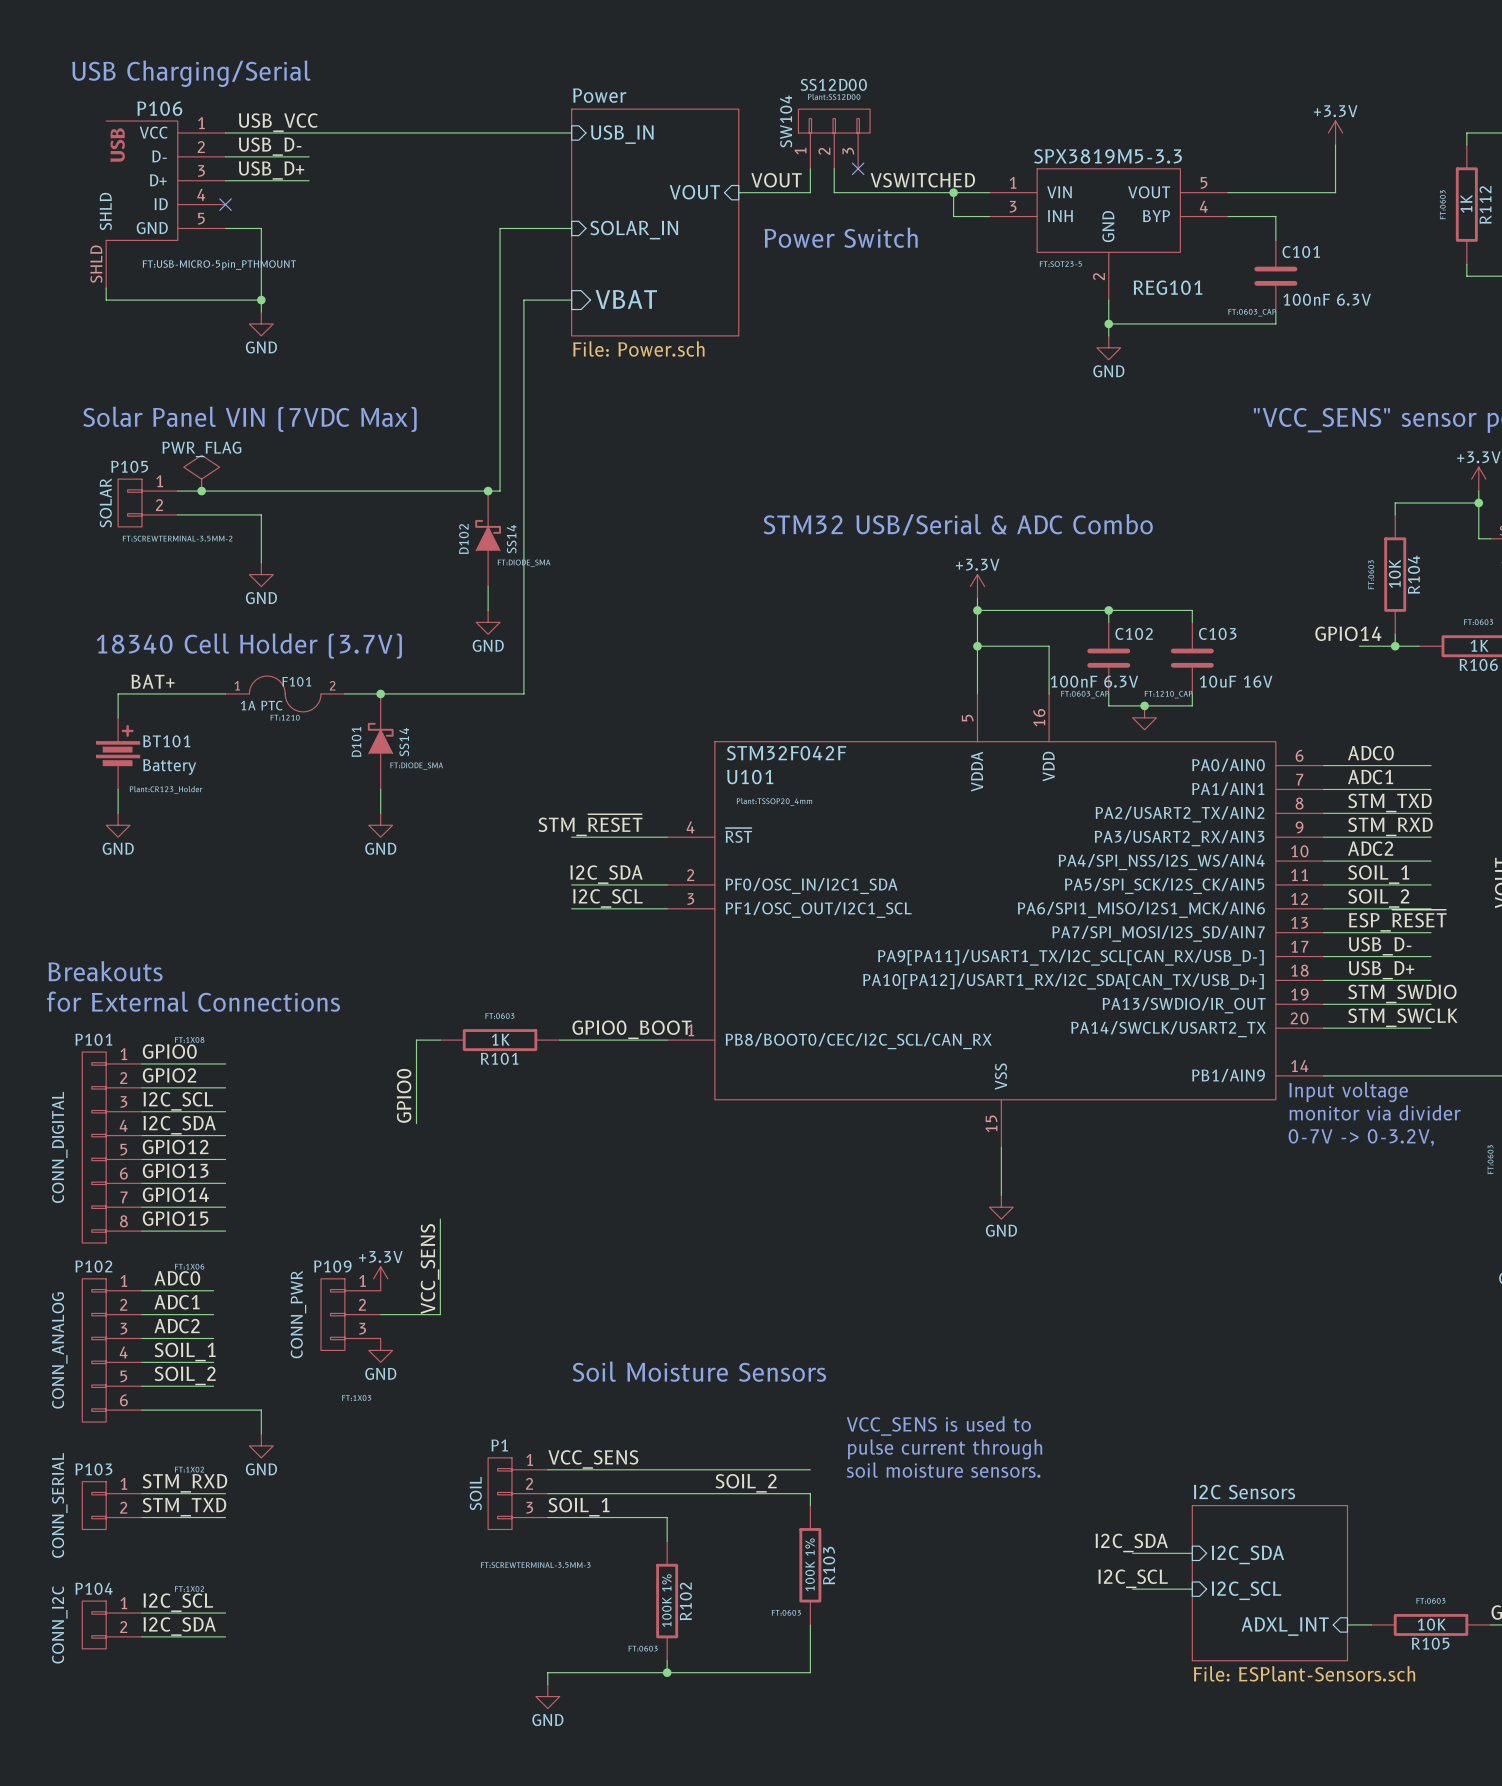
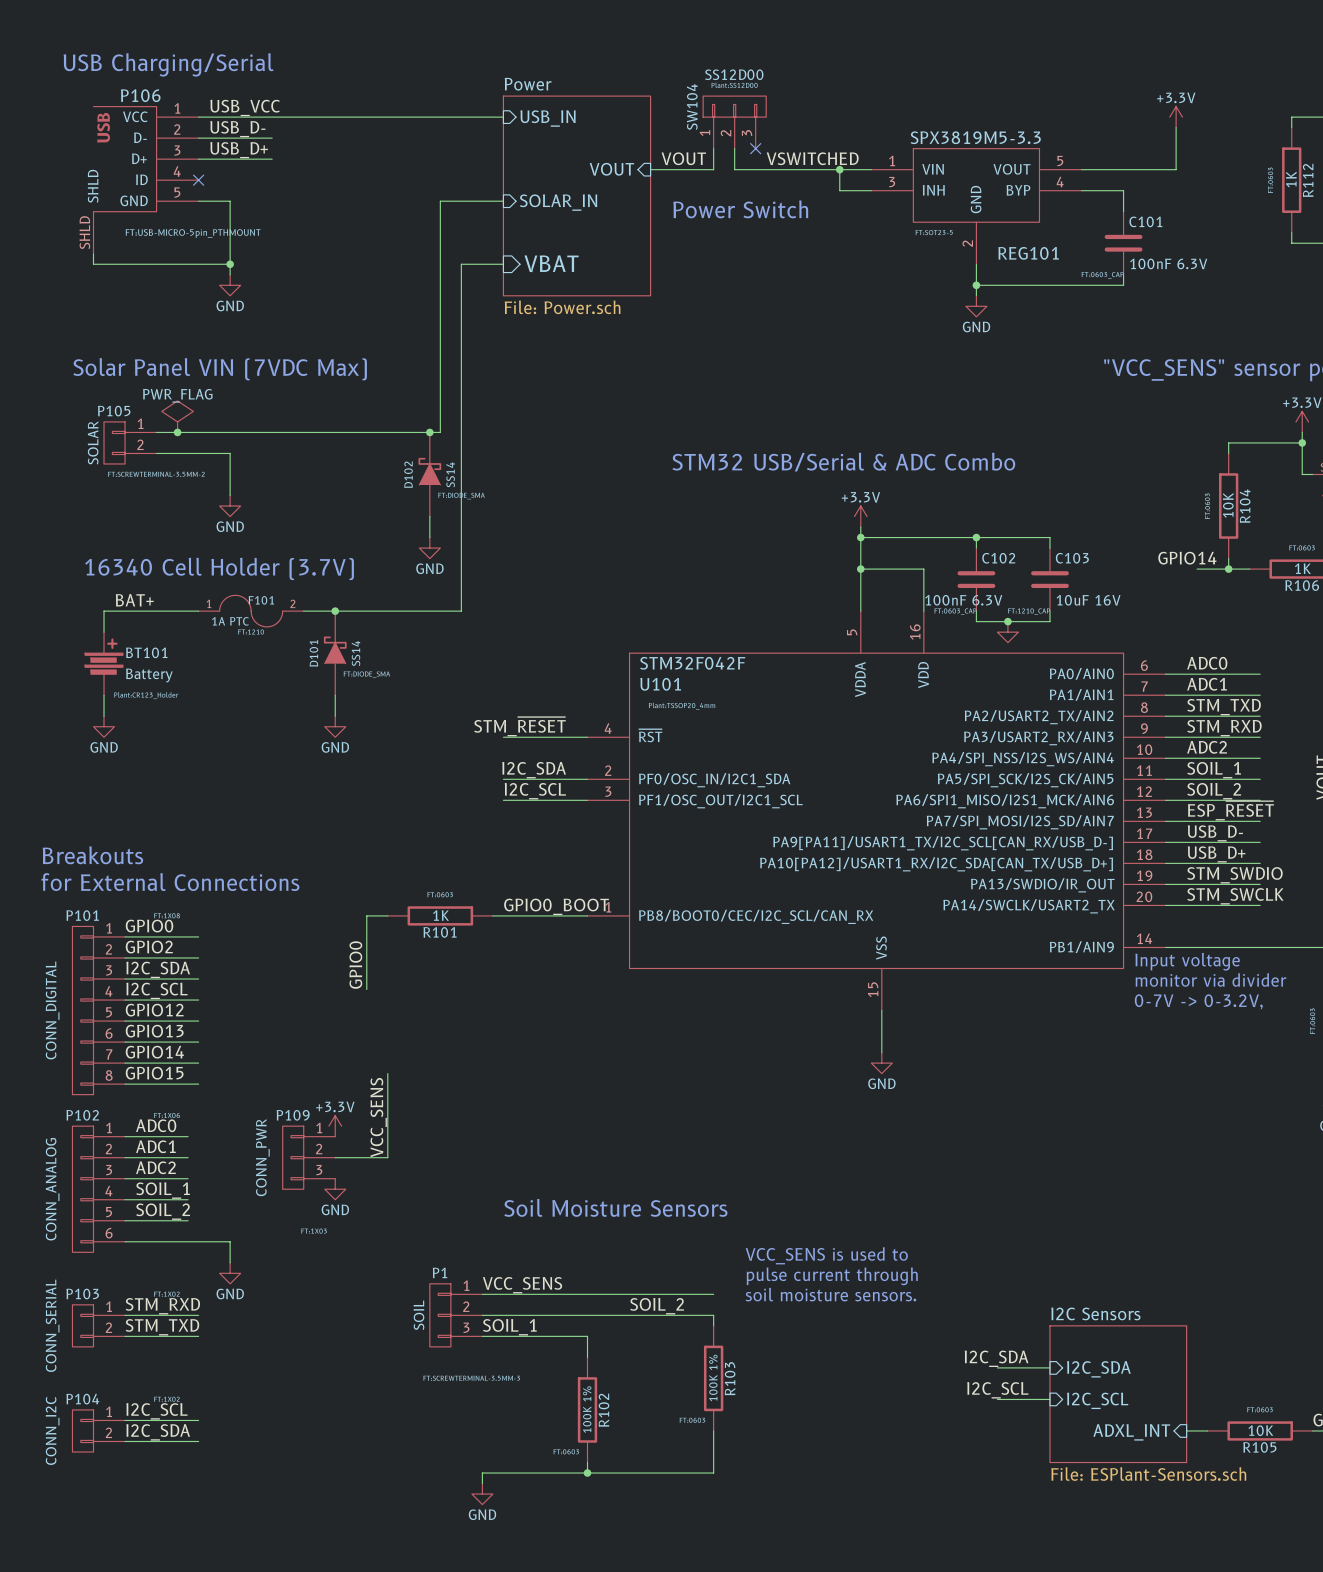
text: 18340 Cell Holder (3.7V) (249, 646) -> 16340 Cell Holder (3.7V) (219, 568)
label: I2C_SCL (178, 1101) -> I2C_SDA (158, 969)
label: I2C_SDA (179, 1125) -> I2C_SCL (156, 990)

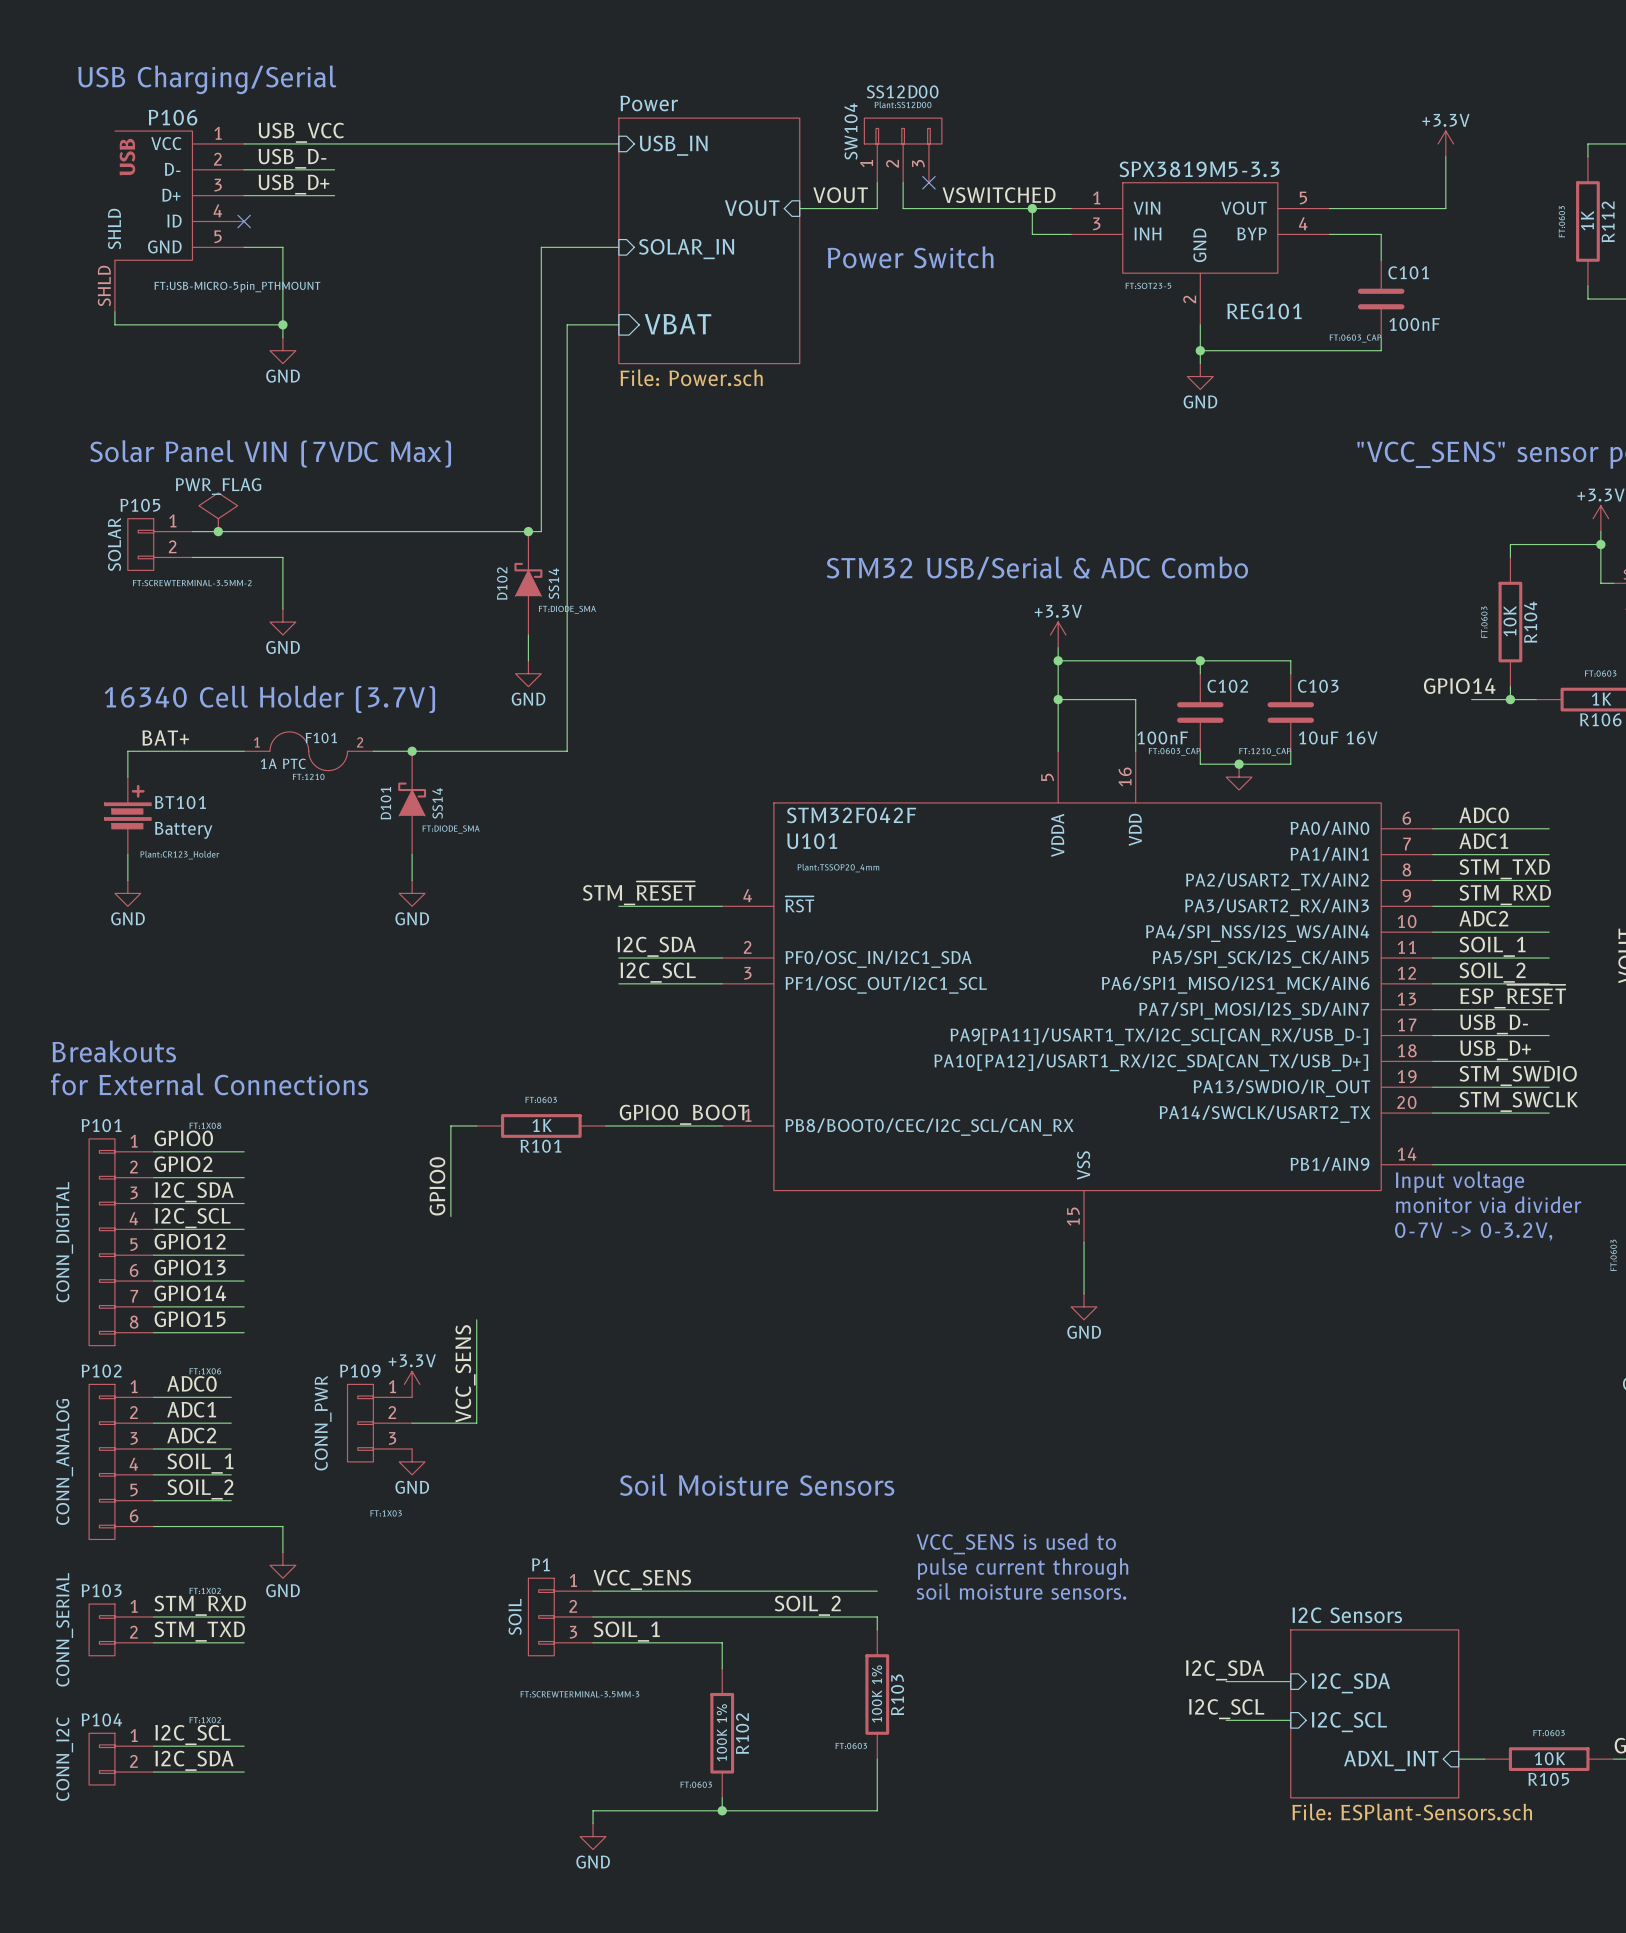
C101 value: 100nF 6.3V (1168, 263) -> 100nF (1414, 324)
C102 value: 100nF 6.3V (963, 600) -> 100nF (1162, 737)

